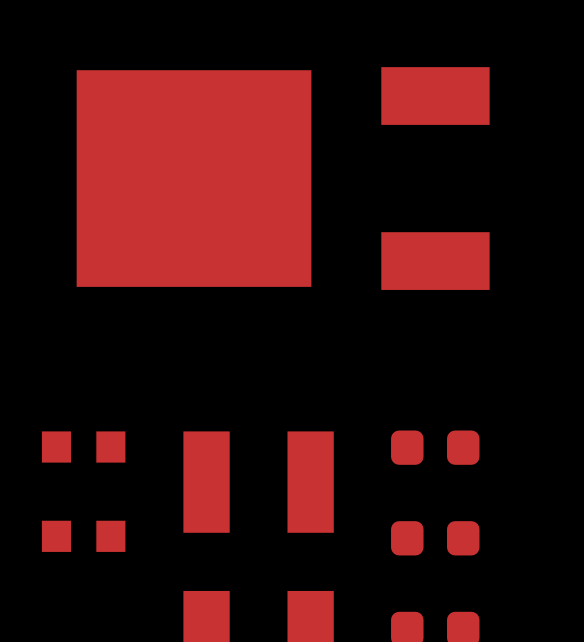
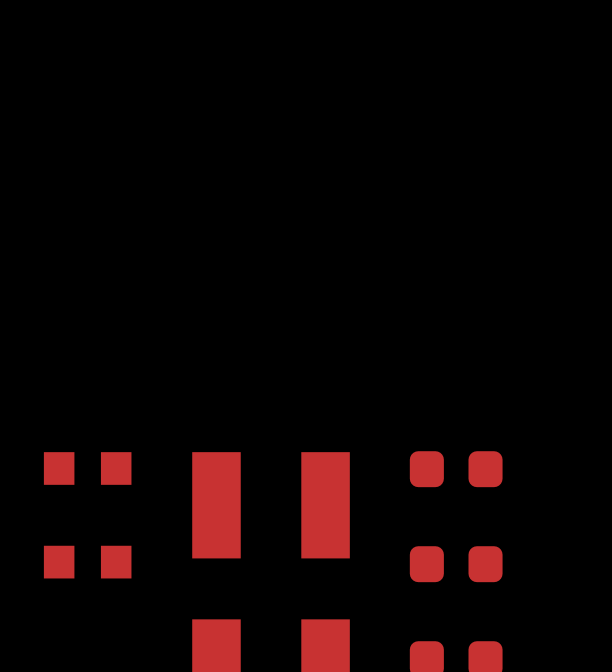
part: (283, 178) -> none

